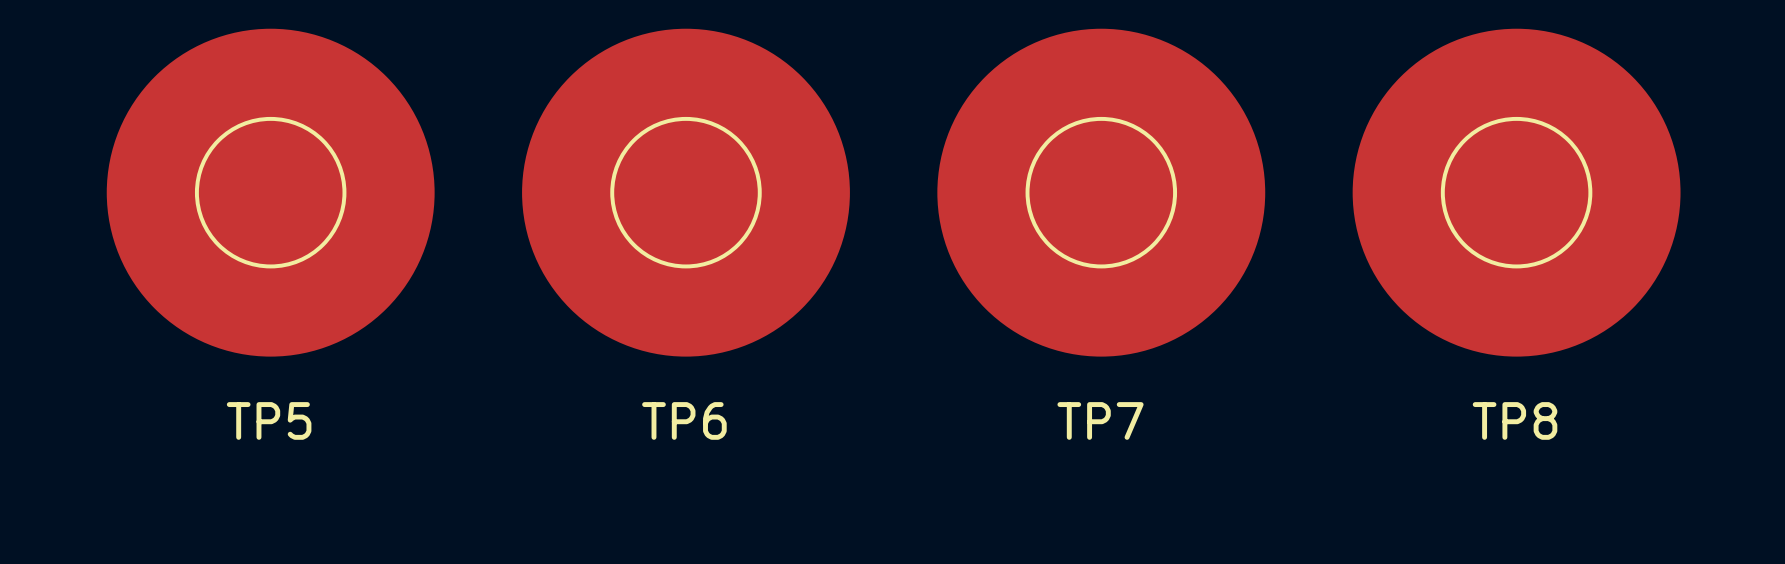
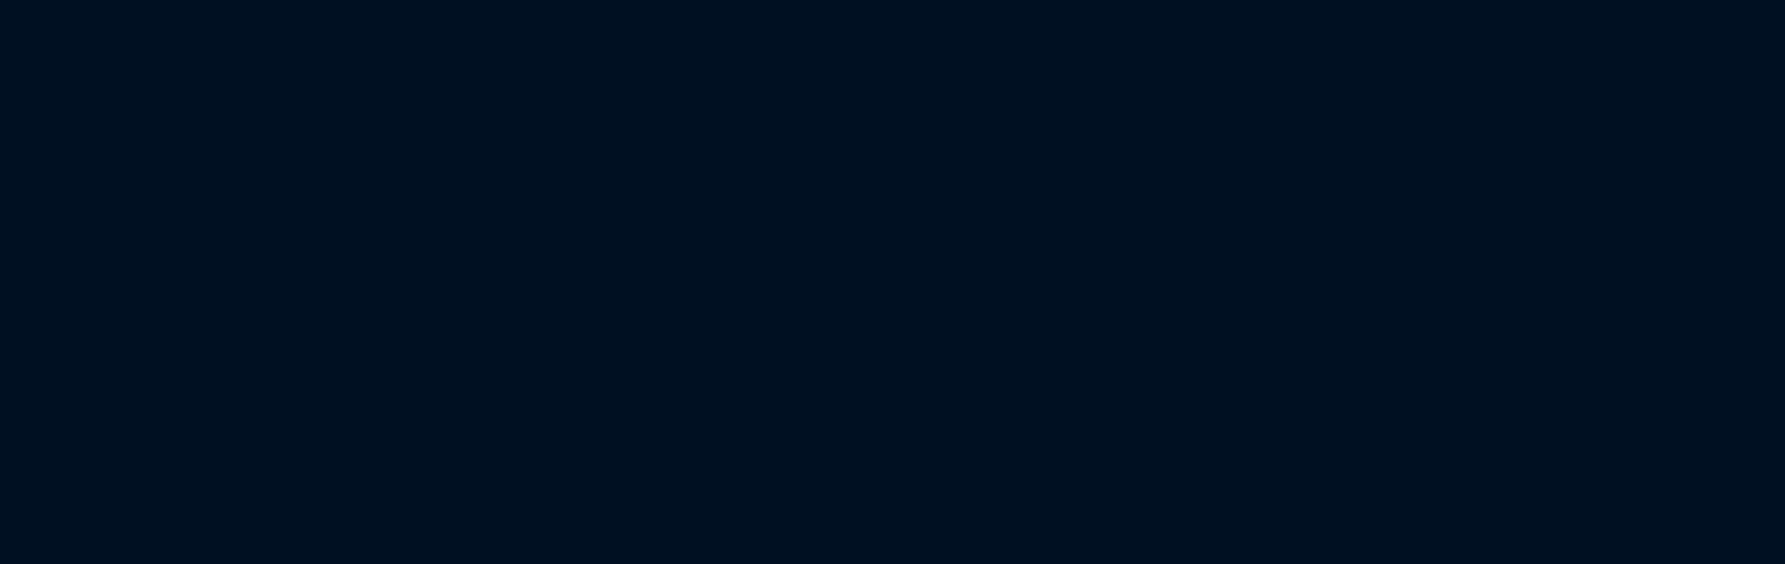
TP5: (270, 192) -> none
TP6: (685, 192) -> none
TP7: (1101, 192) -> none
TP8: (1516, 192) -> none

